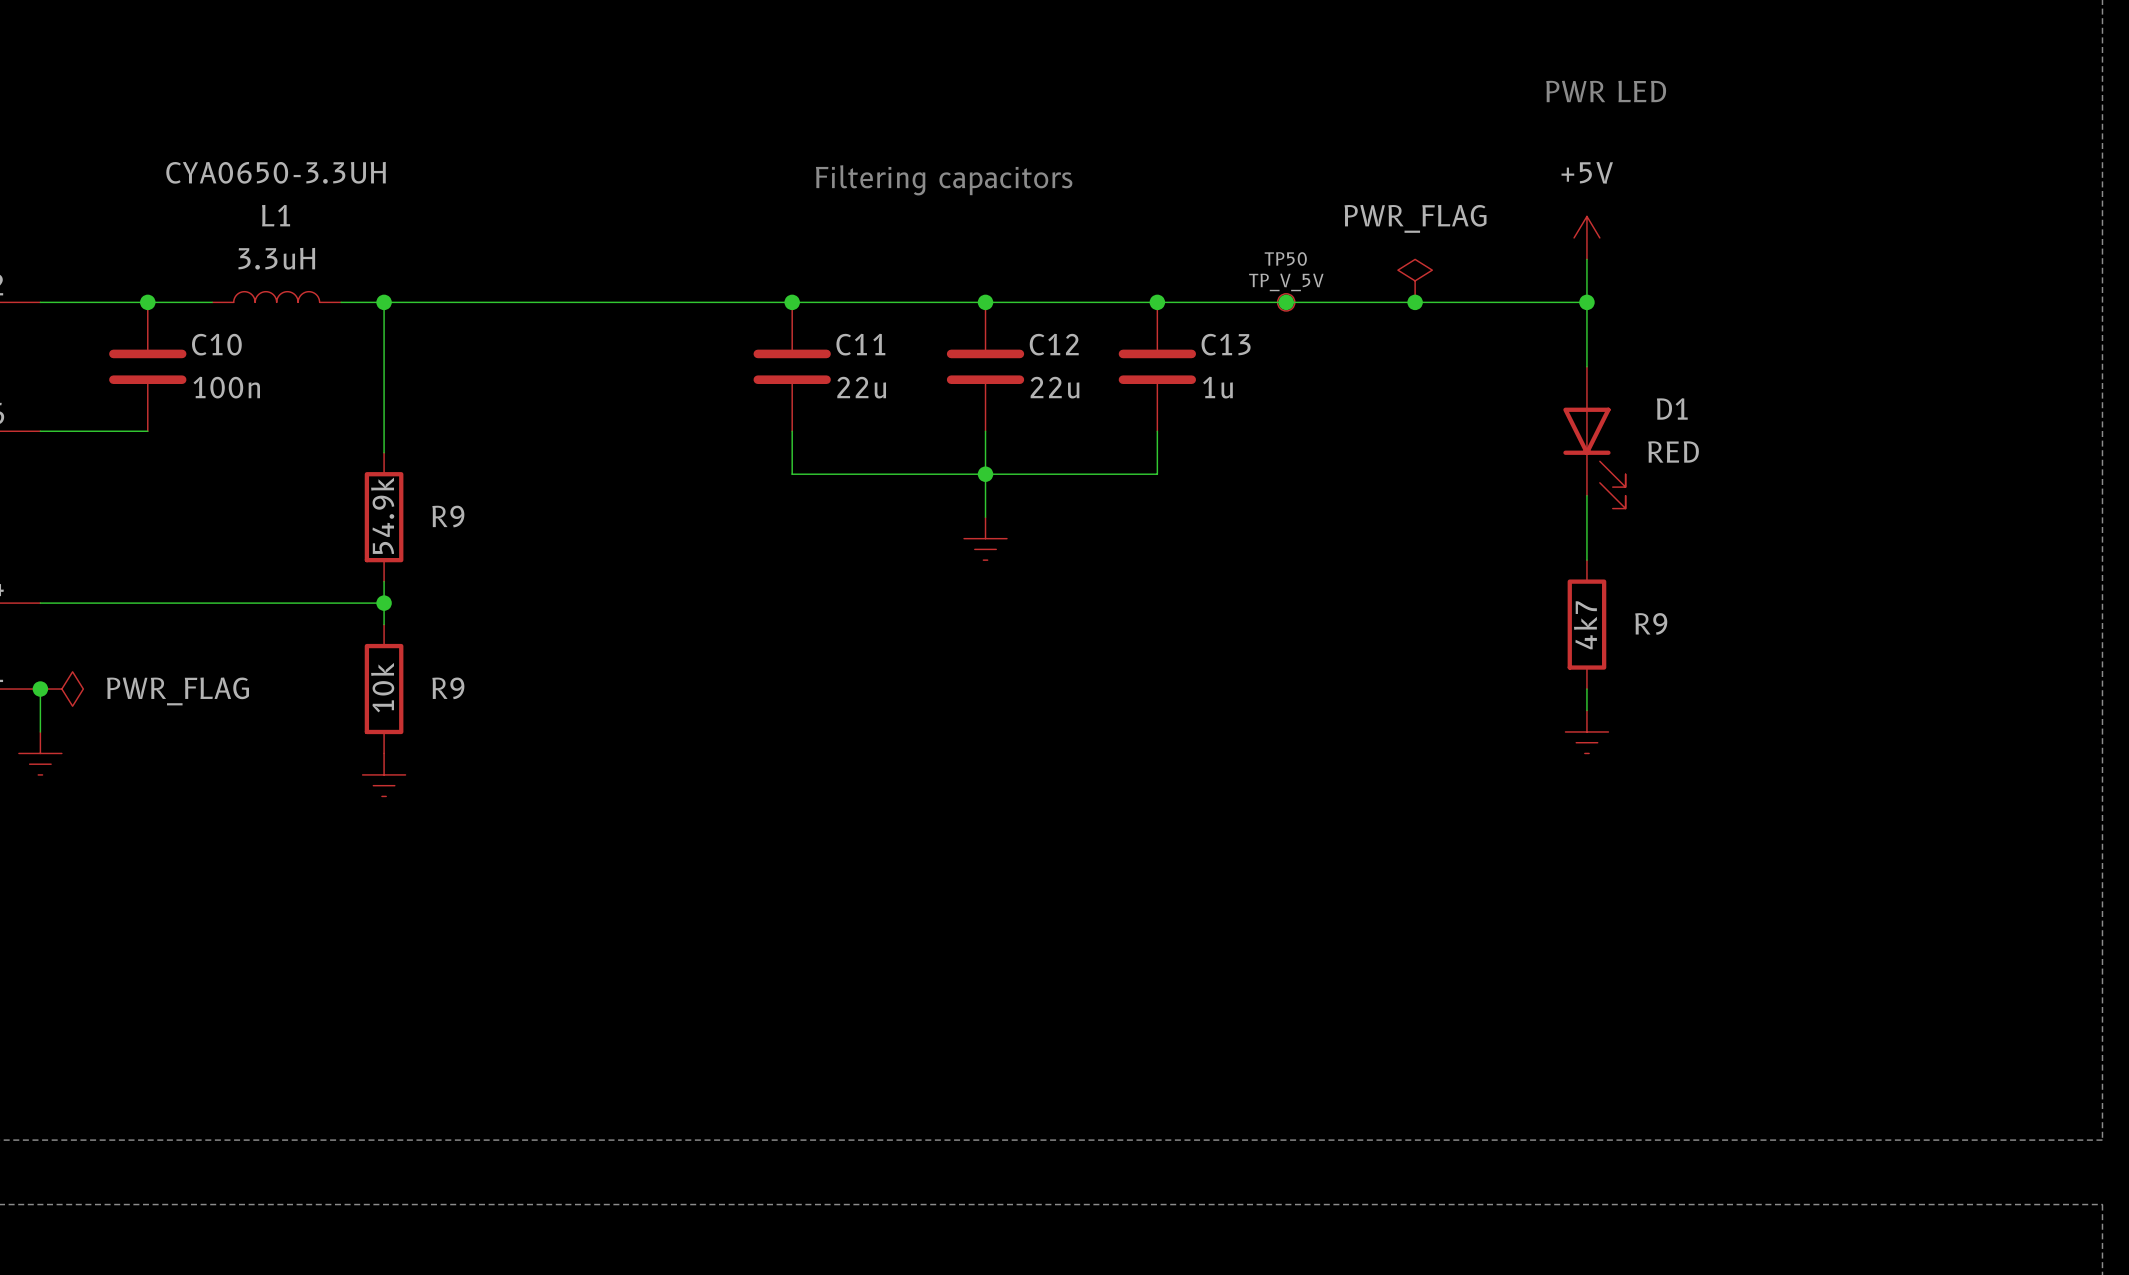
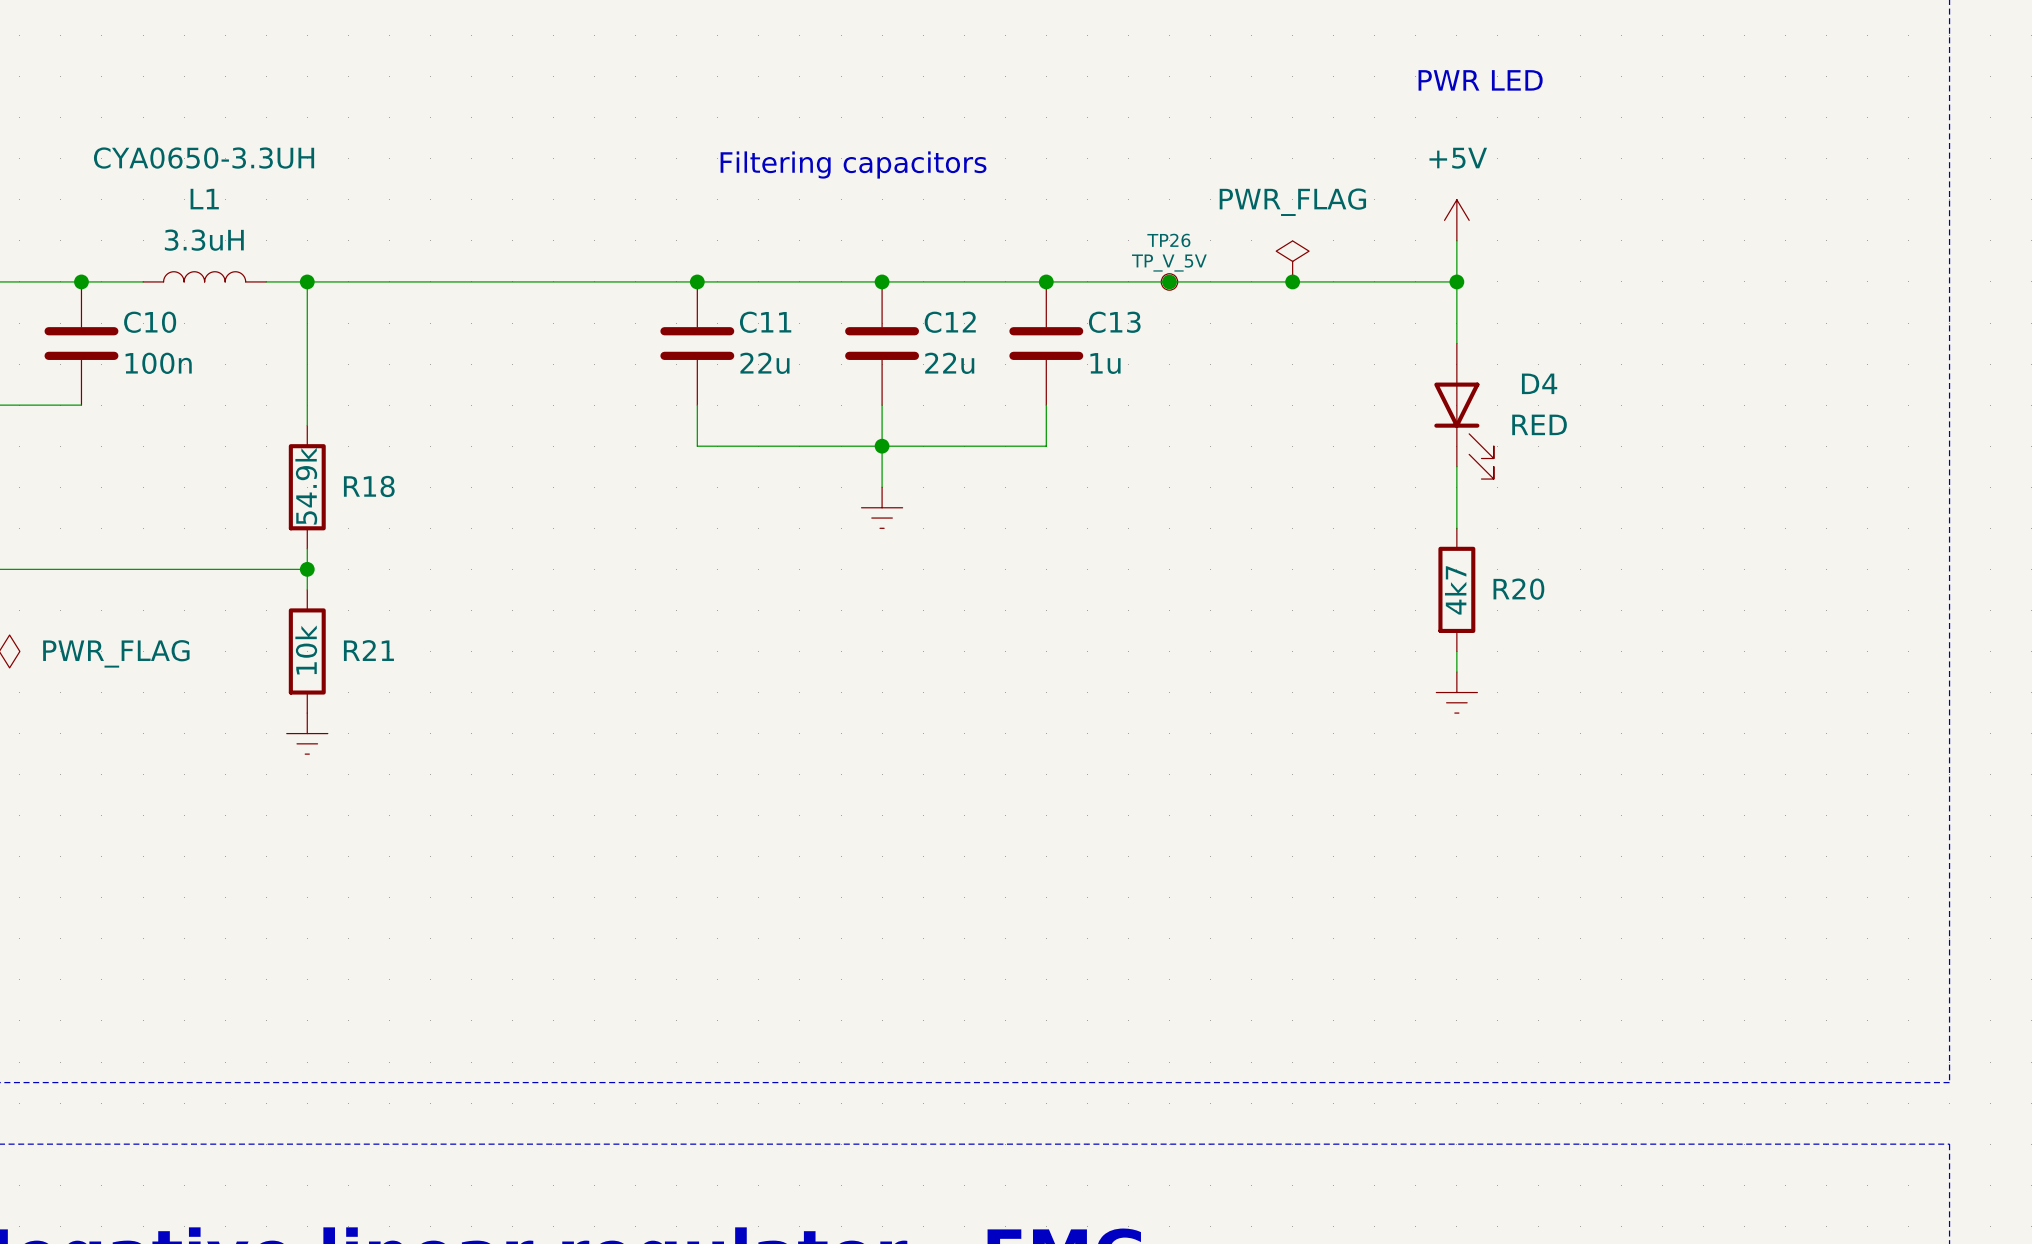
TP50 name: TP50 (1285, 259) -> TP26 (1168, 240)
D1 name: D1 (1672, 408) -> D4 (1539, 383)
R9 name: R9 (448, 516) -> R18 (369, 486)
R9 name: R9 (1651, 623) -> R20 (1518, 589)
R9 name: R9 (448, 688) -> R21 (368, 650)

